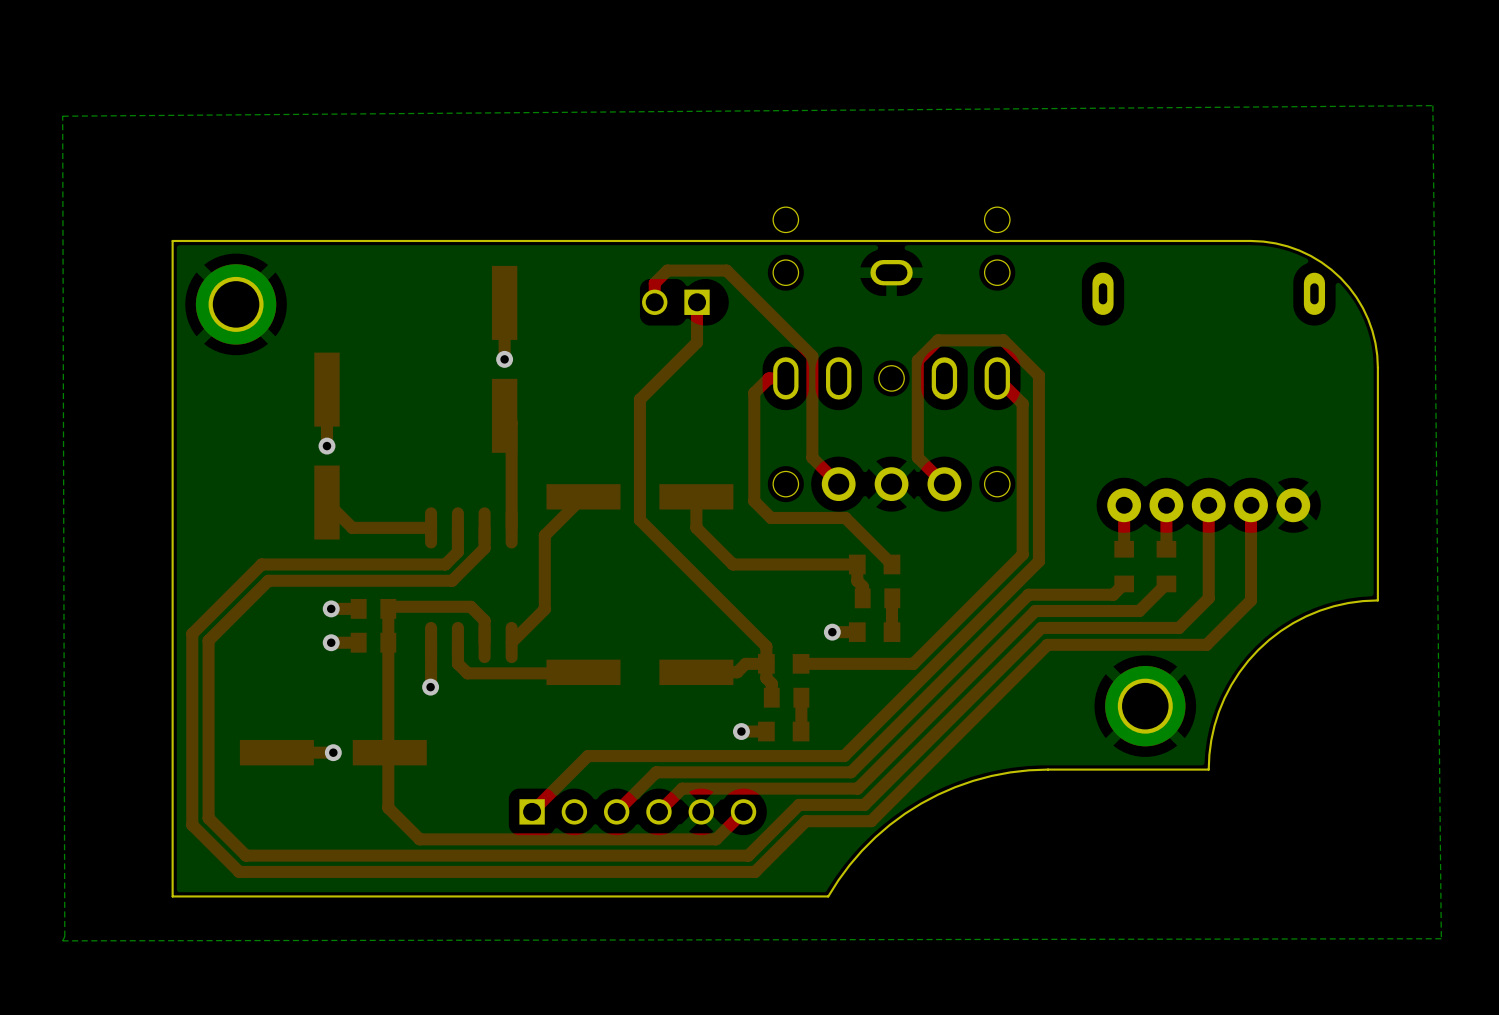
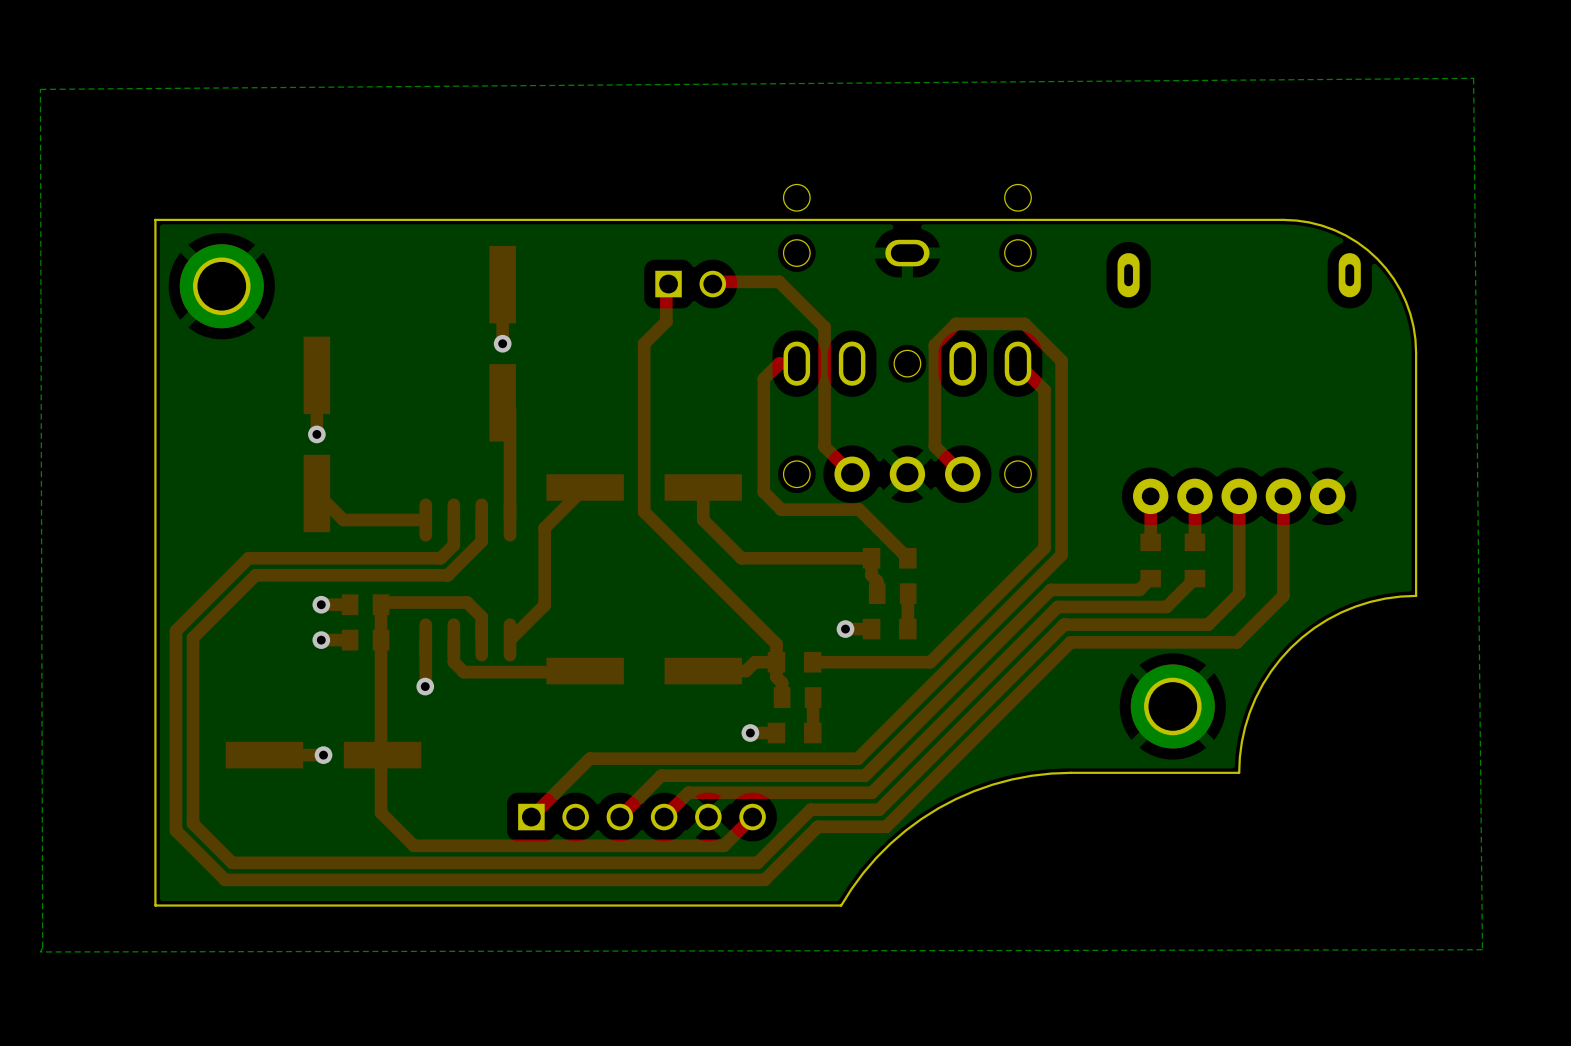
top track: (654, 302) (654, 283) (667, 270) (726, 270) (812, 356) -> (710, 281) (779, 281) (824, 327) (824, 340)
part rotation: 0° (675, 302) -> 180° (690, 284)
top track: (697, 302) (697, 342) (639, 399) -> (666, 281) (666, 321) (644, 343) (644, 385)

